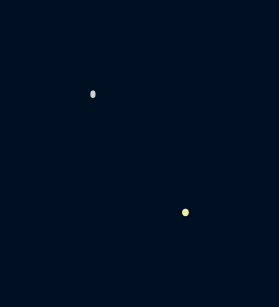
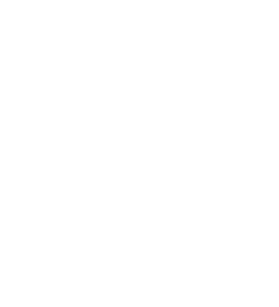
board edge: (92, 92) (92, 95) -> none
line: (185, 212) (185, 212) -> none

